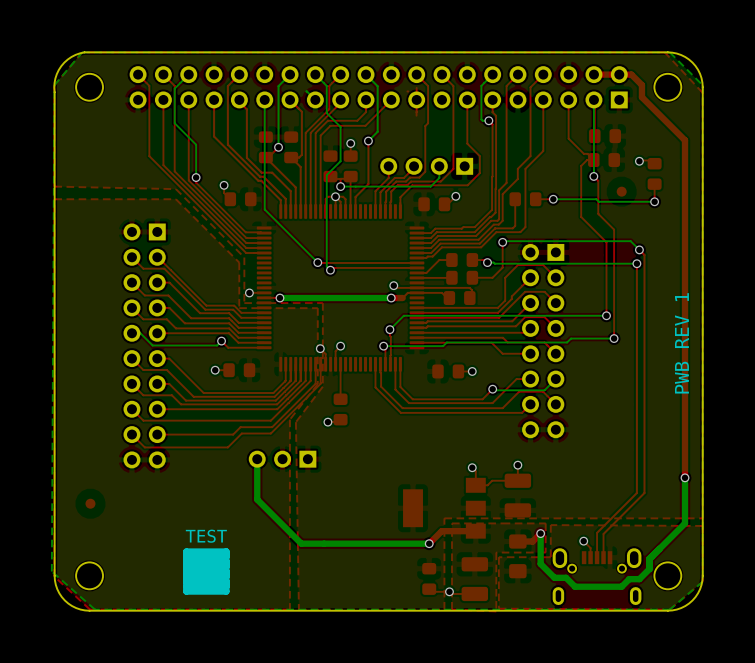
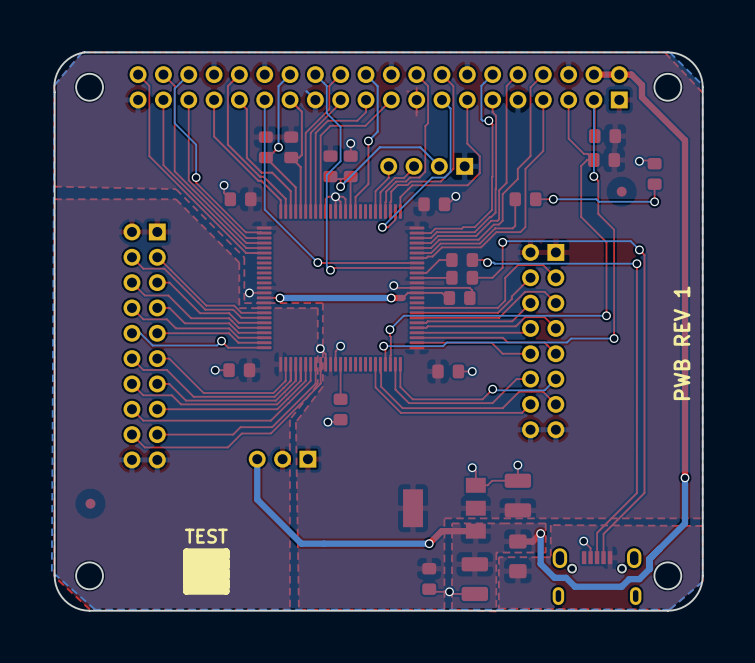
bottom track: none -> (442, 99) (450, 108) (450, 171) (444, 177) (432, 177) (382, 227)
bottom track: (439, 166) (439, 177) (430, 186) (340, 186) -> (439, 166) (420, 147) (379, 147) (340, 186)
top track: none -> (395, 211) (395, 219) (387, 227) (382, 227)
via: none -> (382, 227)

